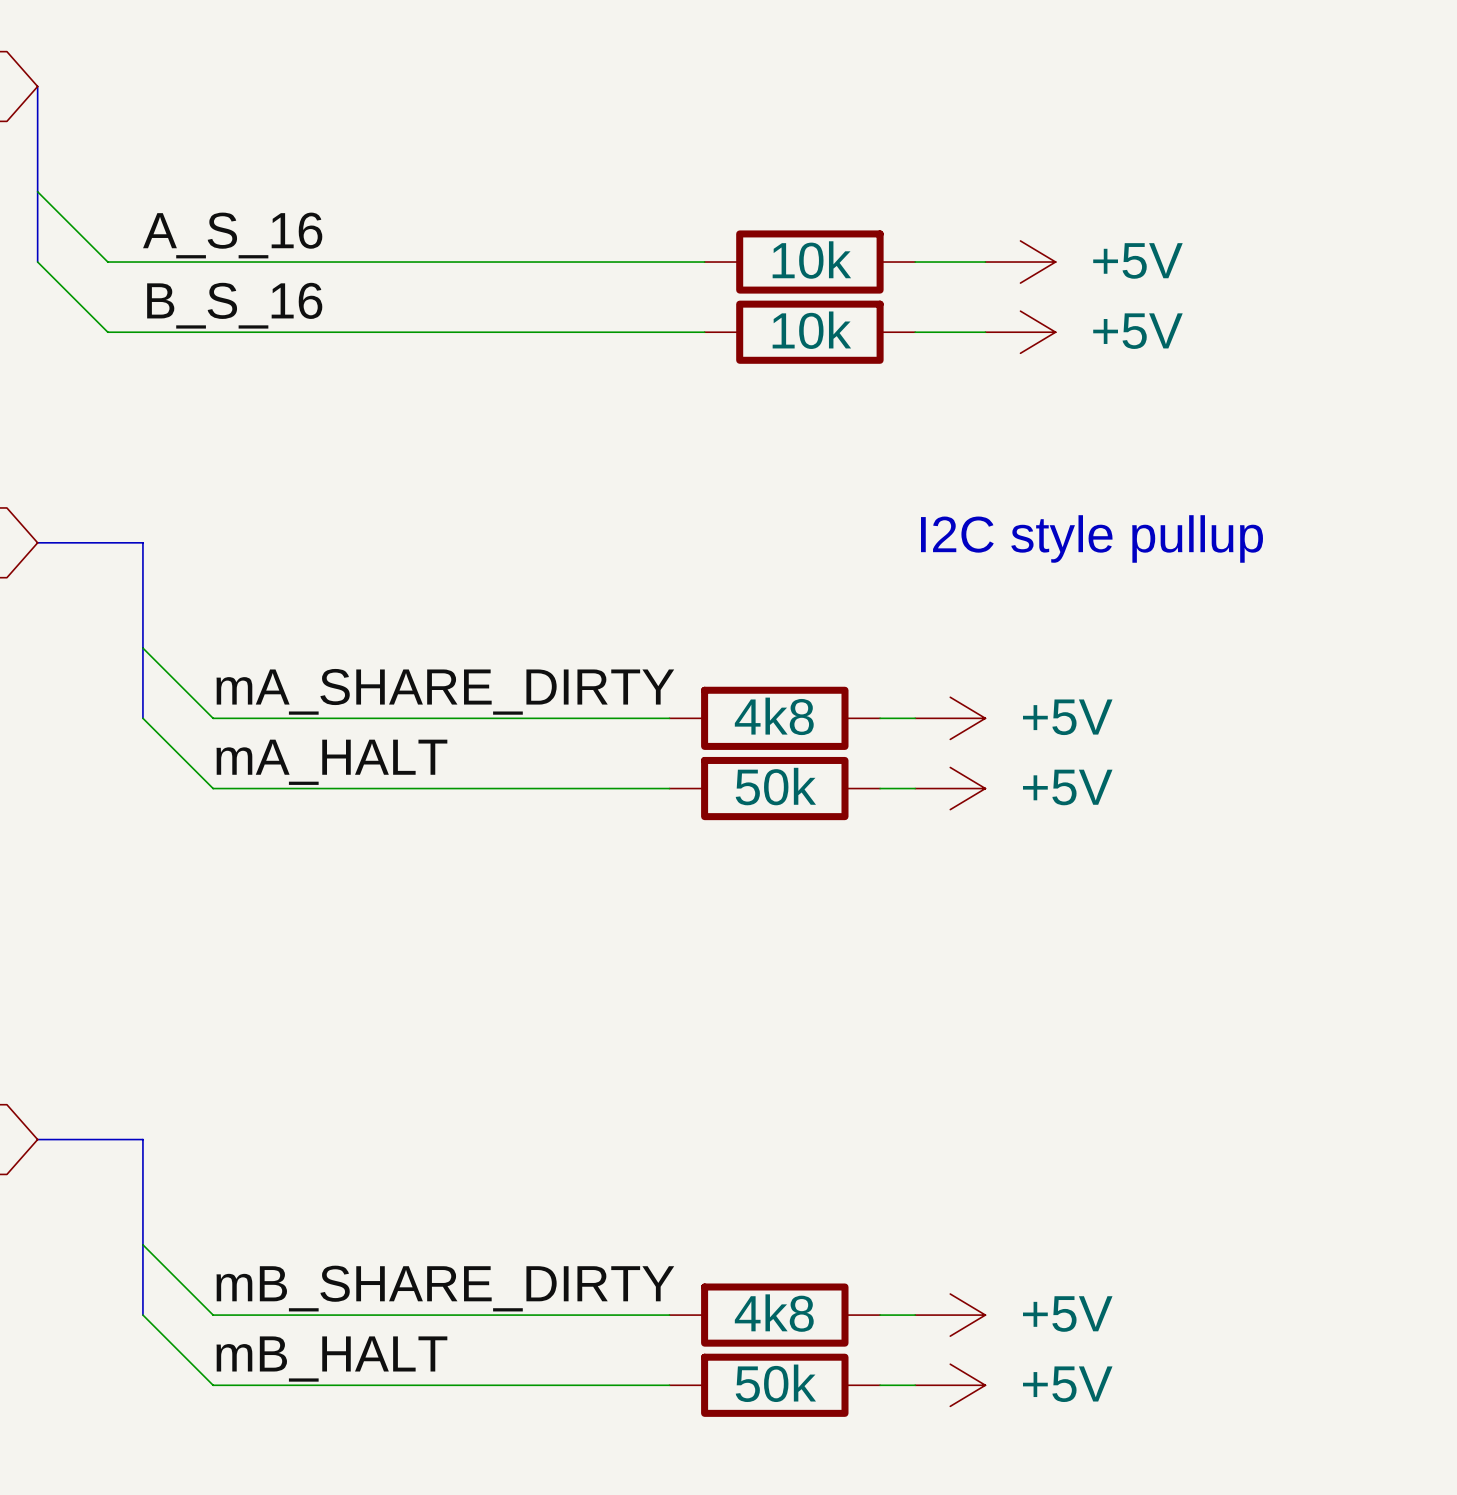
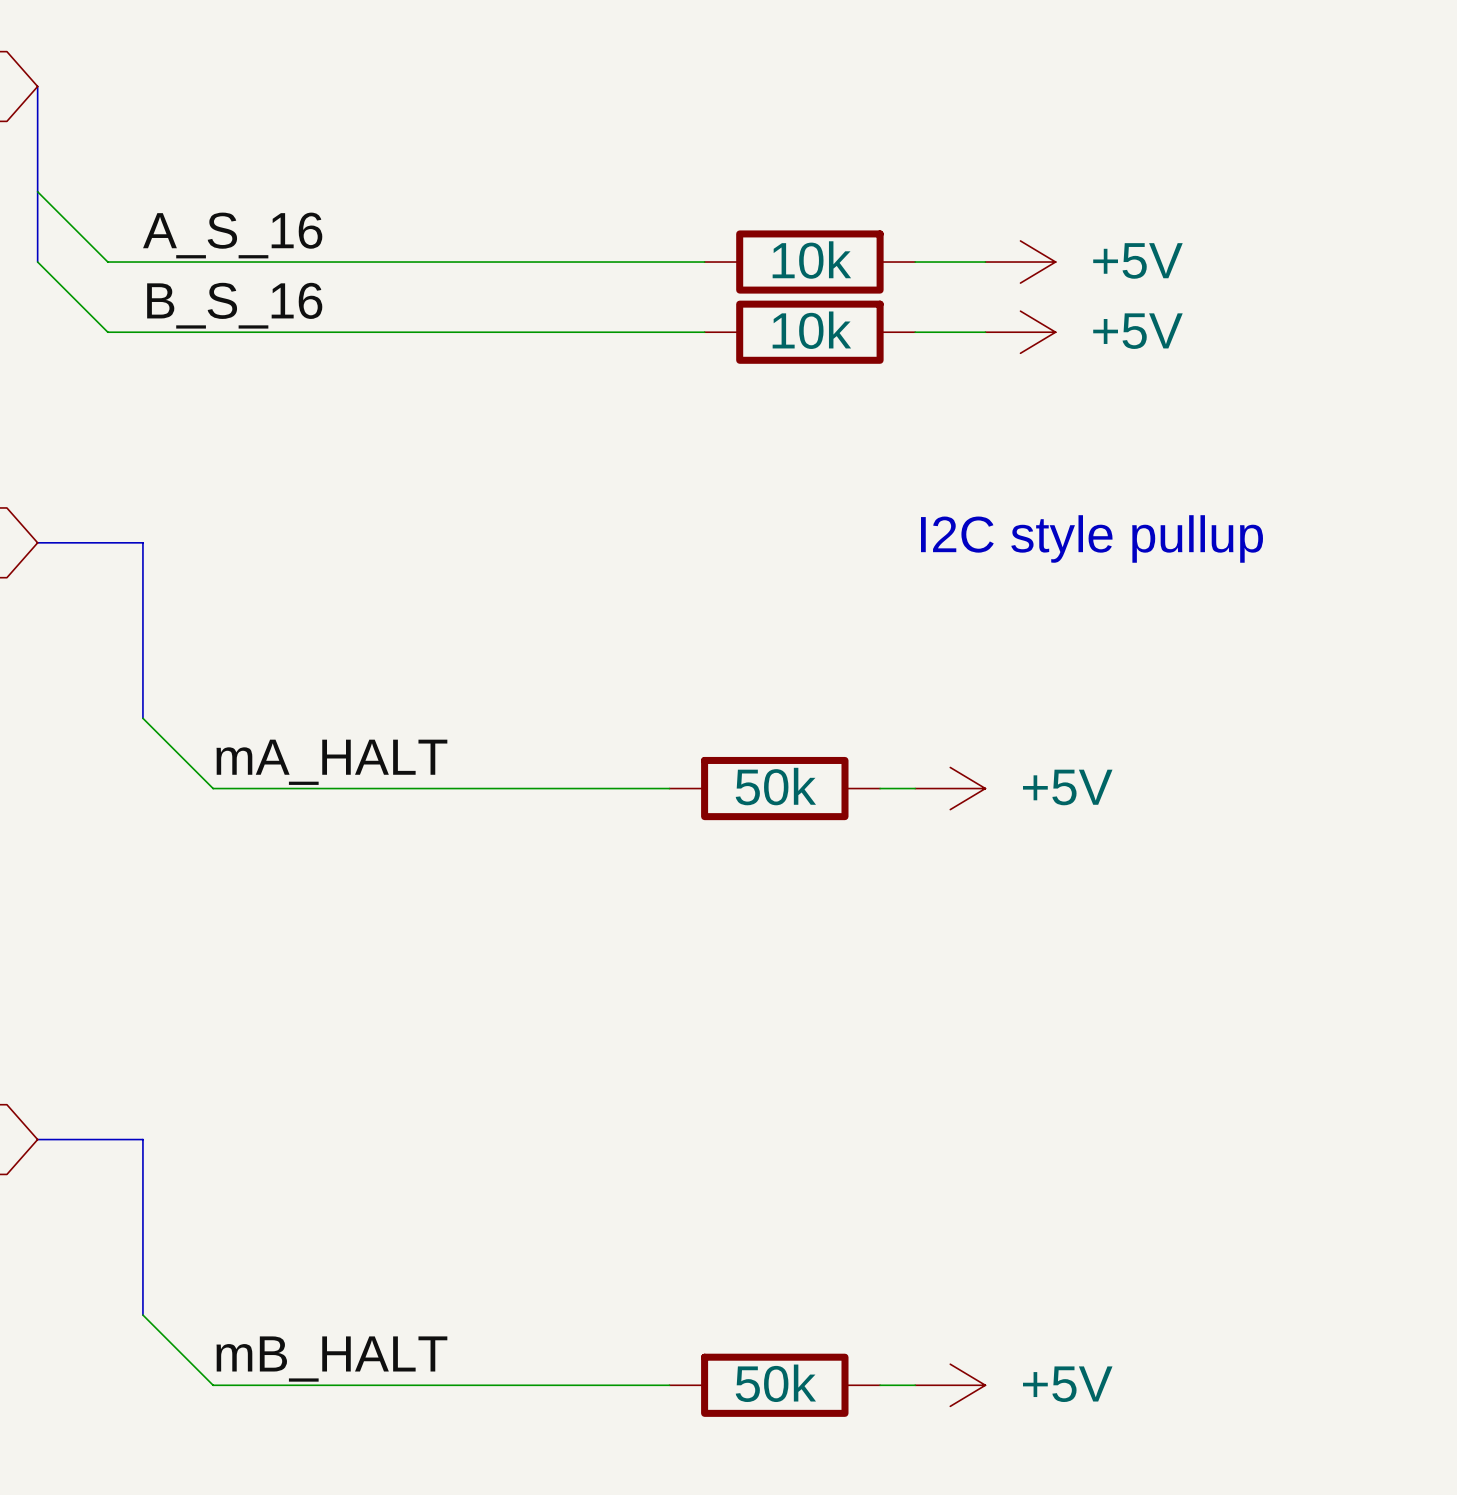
wire: (142, 648) (213, 718) (669, 718) -> none
label: mA_SHARE_DIRTY (445, 691) -> none
part: 4k8 (774, 718) -> none
wire: (880, 718) (915, 718) -> none
power symbol: +5V (950, 718) -> none
wire: (142, 1244) (213, 1315) (669, 1315) -> none
label: mB_SHARE_DIRTY (445, 1288) -> none
part: 4k8 (774, 1315) -> none
wire: (880, 1315) (915, 1315) -> none
power symbol: +5V (950, 1315) -> none

